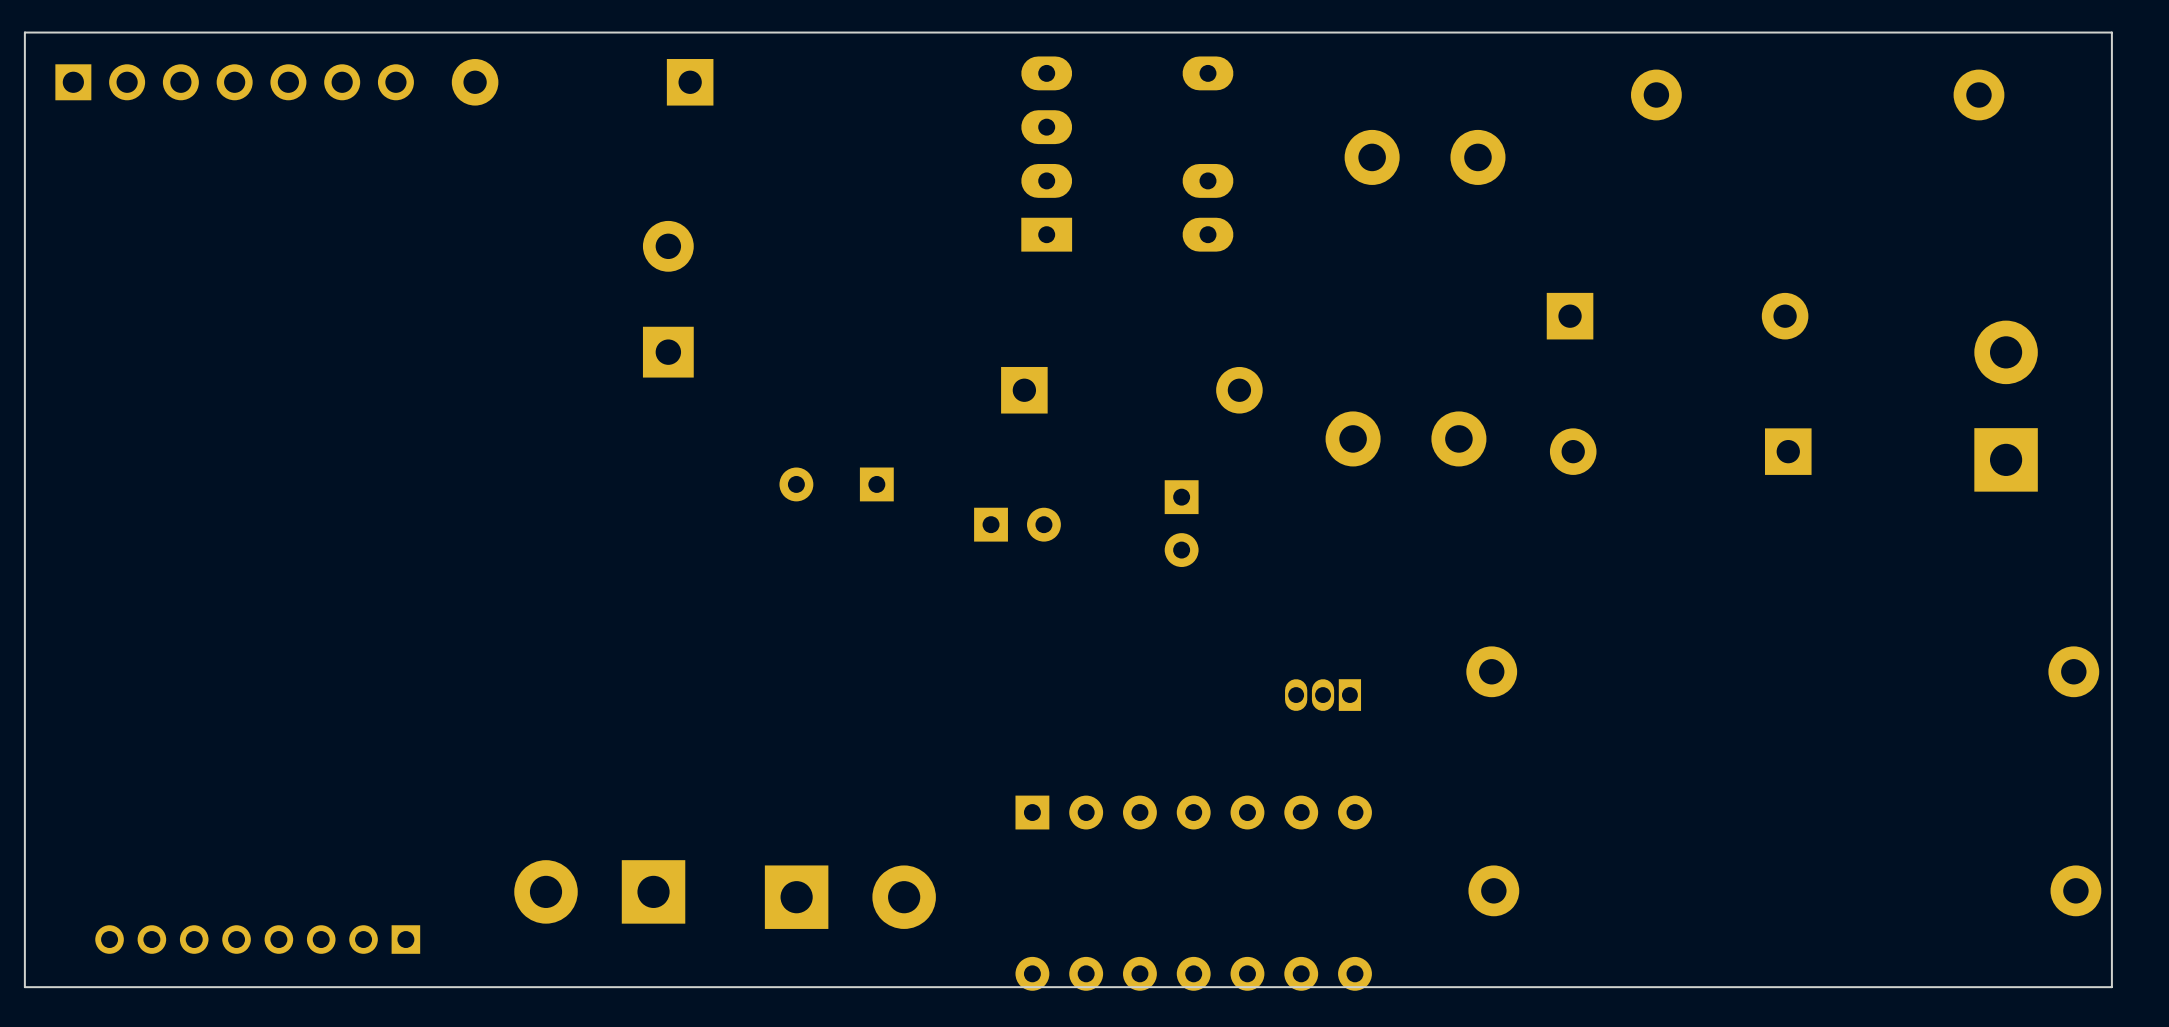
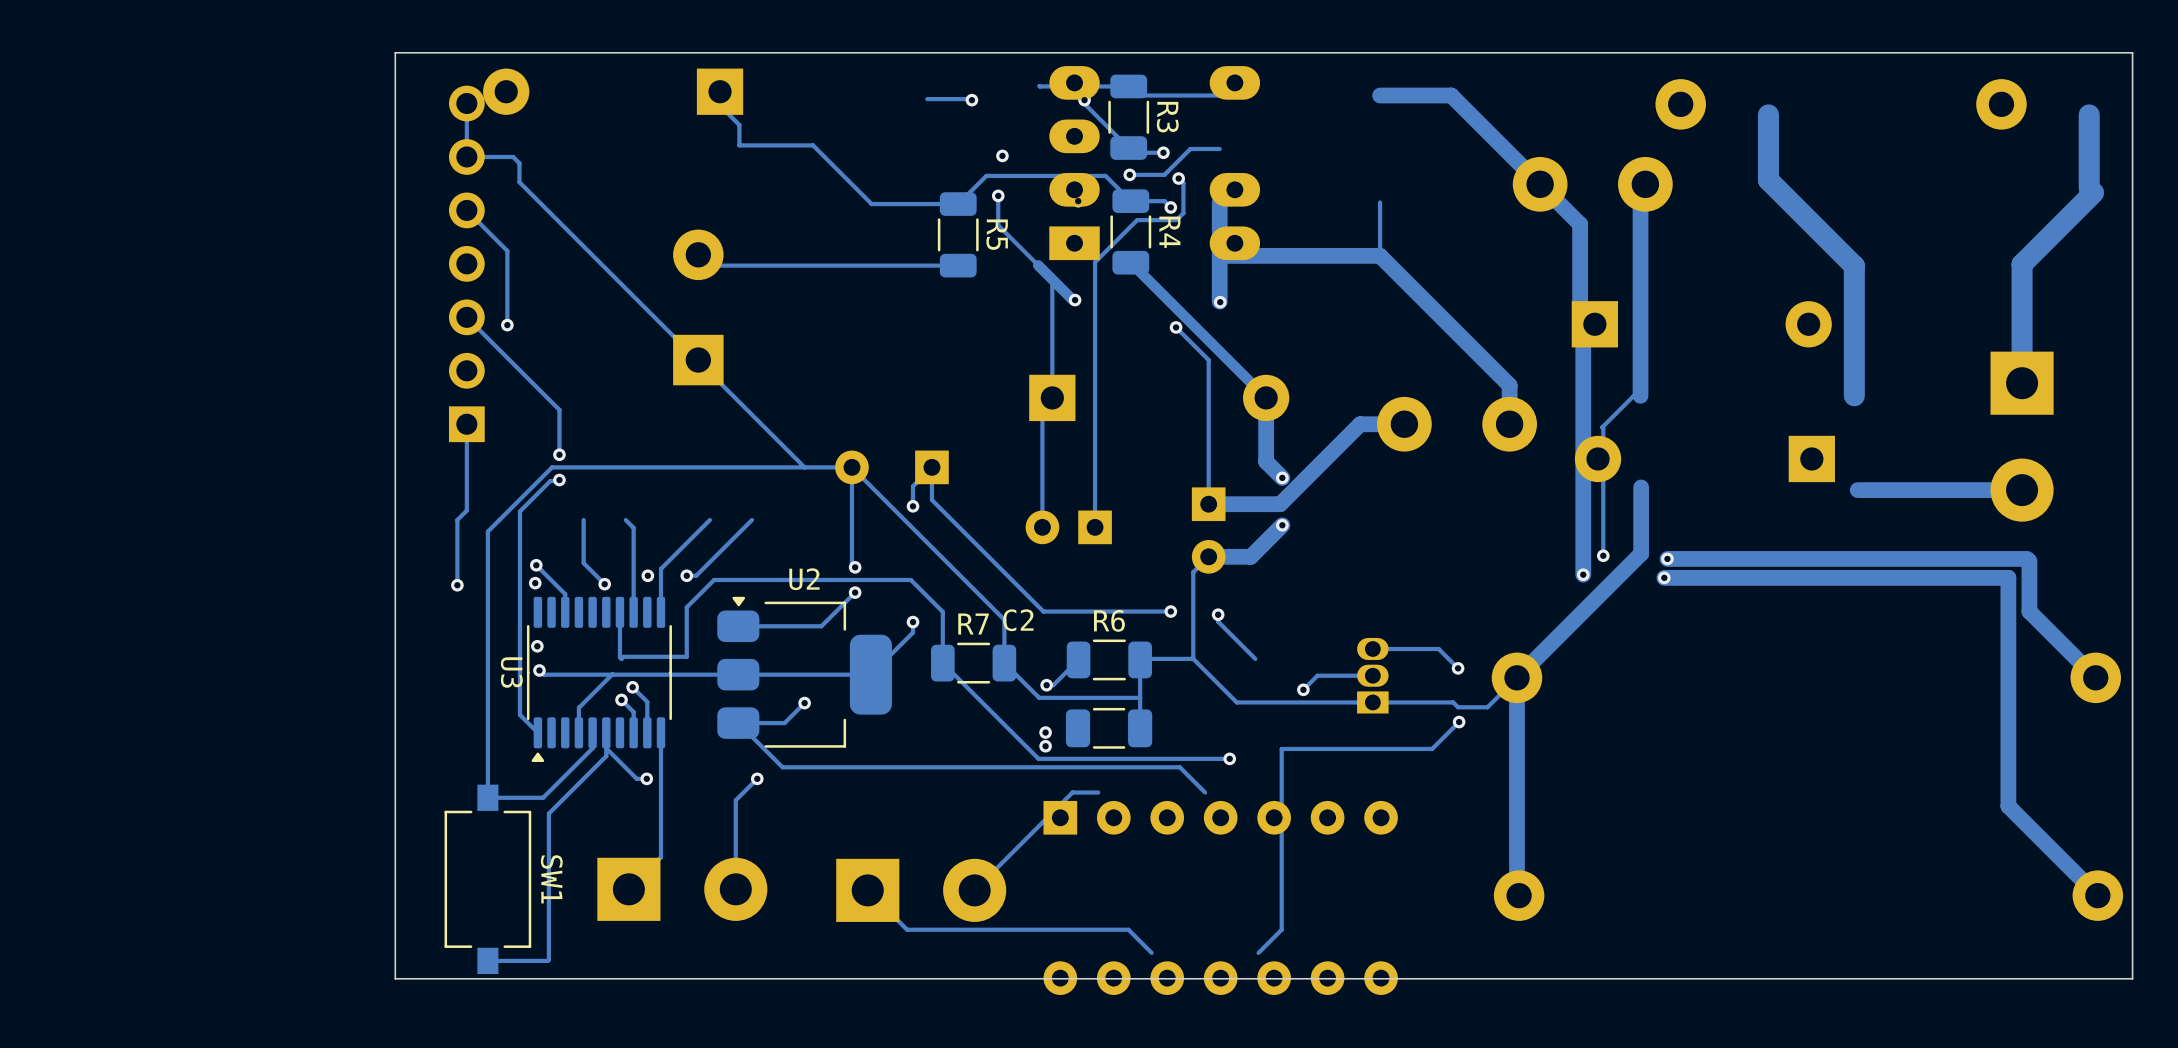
board edge: (2111, 32) (24, 32) (24, 987) (2111, 987) (2111, 32) -> (2132, 52) (2132, 978) (395, 978) (395, 52) (2132, 52)
track: none -> (1039, 85) (1128, 86) (1137, 95) (1219, 95)
part rotation: 0° (234, 82) -> 90° counterclockwise (466, 263)
part position: (234, 82) -> (466, 263)
track: none -> (1380, 95) (1451, 95) (1580, 224) (1580, 335) (1583, 339) (1583, 574)
track: none -> (713, 99) (739, 124) (739, 145) (813, 145) (871, 204) (958, 204) (986, 175) (1105, 175) (1130, 201) (1164, 201) (1170, 207)
track: none -> (927, 99) (971, 100)
via: none -> (971, 100)
track: none -> (1084, 100) (1084, 103) (1133, 152) (1163, 152)
via: none -> (1084, 100)
track: none -> (466, 103) (466, 156) (513, 156) (519, 163) (519, 182) (804, 467)
track: none -> (1768, 114) (1768, 180) (1854, 265) (1854, 395)
track: none -> (2089, 114) (2089, 188)
R3: none -> (1128, 117)
track: none -> (1219, 148) (1190, 148) (1164, 174) (1129, 174)
via: none -> (1163, 152)
via: none -> (1002, 155)
part: (1425, 157) -> none
via: none -> (1129, 174)
track: none -> (1178, 178) (1183, 183) (1183, 213) (1176, 220) (1137, 220) (1095, 262) (1095, 527)
via: none -> (1178, 178)
part: none -> (1592, 184)
track: none -> (1645, 184) (1640, 189) (1640, 395) (1633, 395) (1602, 427) (1603, 555)
track: none -> (2093, 192) (2022, 264) (2022, 383)
track: none -> (998, 195) (998, 225) (1052, 279) (1052, 397) (1042, 407) (1042, 527)
via: none -> (998, 195)
via: none -> (1078, 201)
track: none -> (1219, 202) (1220, 302)
track: none -> (1380, 202) (1380, 255)
via: none -> (1170, 207)
track: none -> (466, 210) (507, 250) (507, 325)
R4: none -> (1130, 231)
R5: none -> (958, 234)
track: none -> (692, 249) (708, 265) (958, 265)
track: none -> (1380, 255) (1219, 255)
track: none -> (1380, 255) (1509, 385) (1509, 424)
track: none -> (1130, 262) (1266, 397) (1266, 461) (1282, 477)
track: none -> (1038, 265) (1075, 300)
via: none -> (1075, 300)
via: none -> (1220, 302)
track: none -> (466, 317) (559, 409) (559, 454)
via: none -> (507, 325)
track: none -> (1176, 327) (1208, 360) (1208, 504) (1280, 504) (1360, 424) (1404, 424)
via: none -> (1176, 327)
part rotation: 0° (2006, 406) -> 180° (2022, 436)
track: none -> (466, 424) (466, 510) (457, 519) (457, 585)
part position: (1406, 438) -> (1457, 424)
via: none -> (559, 454)
track: none -> (851, 467) (552, 467) (487, 531) (487, 797) (543, 797) (592, 748) (592, 732)
track: none -> (851, 467) (1004, 619) (1004, 663) (1039, 697) (1140, 697)
track: none -> (851, 467) (851, 564) (855, 567)
via: none -> (1282, 477)
track: none -> (559, 480) (550, 481) (519, 511) (519, 714) (537, 732)
via: none -> (559, 480)
track: none -> (1641, 487) (1641, 553) (1517, 677)
track: none -> (1854, 487) (1857, 490) (2022, 490)
part position: (836, 484) -> (891, 467)
track: none -> (913, 506) (913, 486) (931, 467) (931, 500) (1043, 611) (1170, 611)
via: none -> (913, 506)
track: none -> (583, 519) (583, 563) (604, 584)
track: none -> (625, 519) (633, 527) (633, 612)
track: none -> (709, 519) (660, 568) (660, 612)
track: none -> (752, 519) (696, 575) (686, 575)
track: none -> (1282, 525) (1250, 556) (1208, 556) (1193, 572) (1193, 658)
via: none -> (1282, 525)
part rotation: 0° (1017, 524) -> 180° (1068, 527)
via: none -> (1603, 555)
track: none -> (1667, 558) (2027, 558) (2029, 561) (2029, 611) (2095, 677)
via: none -> (1667, 558)
track: none -> (536, 565) (565, 594) (565, 612)
via: none -> (536, 565)
via: none -> (855, 567)
via: none -> (1583, 574)
via: none -> (647, 575)
via: none -> (686, 575)
track: none -> (1664, 577) (2008, 577) (2008, 806) (2097, 895)
via: none -> (1664, 577)
via: none -> (535, 583)
via: none -> (604, 584)
via: none -> (457, 585)
track: none -> (855, 592) (821, 626) (738, 626)
via: none -> (855, 592)
track: none -> (619, 612) (619, 657) (621, 658) (623, 656) (686, 656) (686, 607) (714, 579) (910, 579) (942, 611) (942, 663) (1038, 758) (1229, 758)
via: none -> (1170, 611)
track: none -> (1218, 614) (1218, 621) (1255, 658)
via: none -> (1218, 614)
track: none -> (913, 622) (913, 632) (870, 674) (543, 674) (539, 670)
via: none -> (913, 622)
via: none -> (537, 646)
track: none -> (1372, 649) (1438, 649) (1458, 668)
track: none -> (1193, 658) (1236, 702) (1453, 702) (1458, 707) (1487, 707) (1517, 677)
track: none -> (1193, 658) (1140, 659) (1140, 728)
track: none -> (1078, 659) (1053, 685) (1046, 685)
R6: none -> (1109, 659)
R7: none -> (973, 663)
via: none -> (1458, 668)
via: none -> (539, 670)
U2: none -> (804, 672)
track: none -> (612, 674) (578, 707) (578, 732)
track: none -> (1372, 675) (1317, 675) (1303, 689)
track: none -> (1517, 677) (1517, 893) (1519, 895)
U3: none -> (599, 679)
via: none -> (1046, 685)
track: none -> (632, 687) (647, 701) (647, 732)
via: none -> (632, 687)
via: none -> (1303, 689)
track: none -> (621, 699) (633, 712) (633, 732)
via: none -> (621, 699)
part rotation: 0° (1323, 695) -> 90° clockwise (1372, 675)
track: none -> (804, 703) (784, 723) (738, 723) (782, 767) (1179, 767) (1205, 792)
via: none -> (804, 703)
track: none -> (1459, 722) (1432, 748) (1281, 748) (1281, 929) (1258, 952)
via: none -> (1459, 722)
C2: none -> (1109, 728)
via: none -> (1045, 732)
track: none -> (606, 732) (606, 756) (548, 813) (548, 959) (487, 960)
track: none -> (660, 732) (660, 857) (628, 889)
via: none -> (1045, 746)
track: none -> (606, 748) (636, 778) (646, 778)
via: none -> (1229, 758)
via: none -> (646, 778)
track: none -> (757, 778) (735, 800) (735, 889)
via: none -> (757, 778)
track: none -> (1098, 792) (1072, 792) (974, 890)
SW1: none -> (487, 879)
track: none -> (867, 890) (907, 929) (1128, 929) (1151, 952)
part rotation: 0° (599, 891) -> 180° (682, 889)
part position: (850, 897) -> (921, 890)
part: (257, 939) -> none

